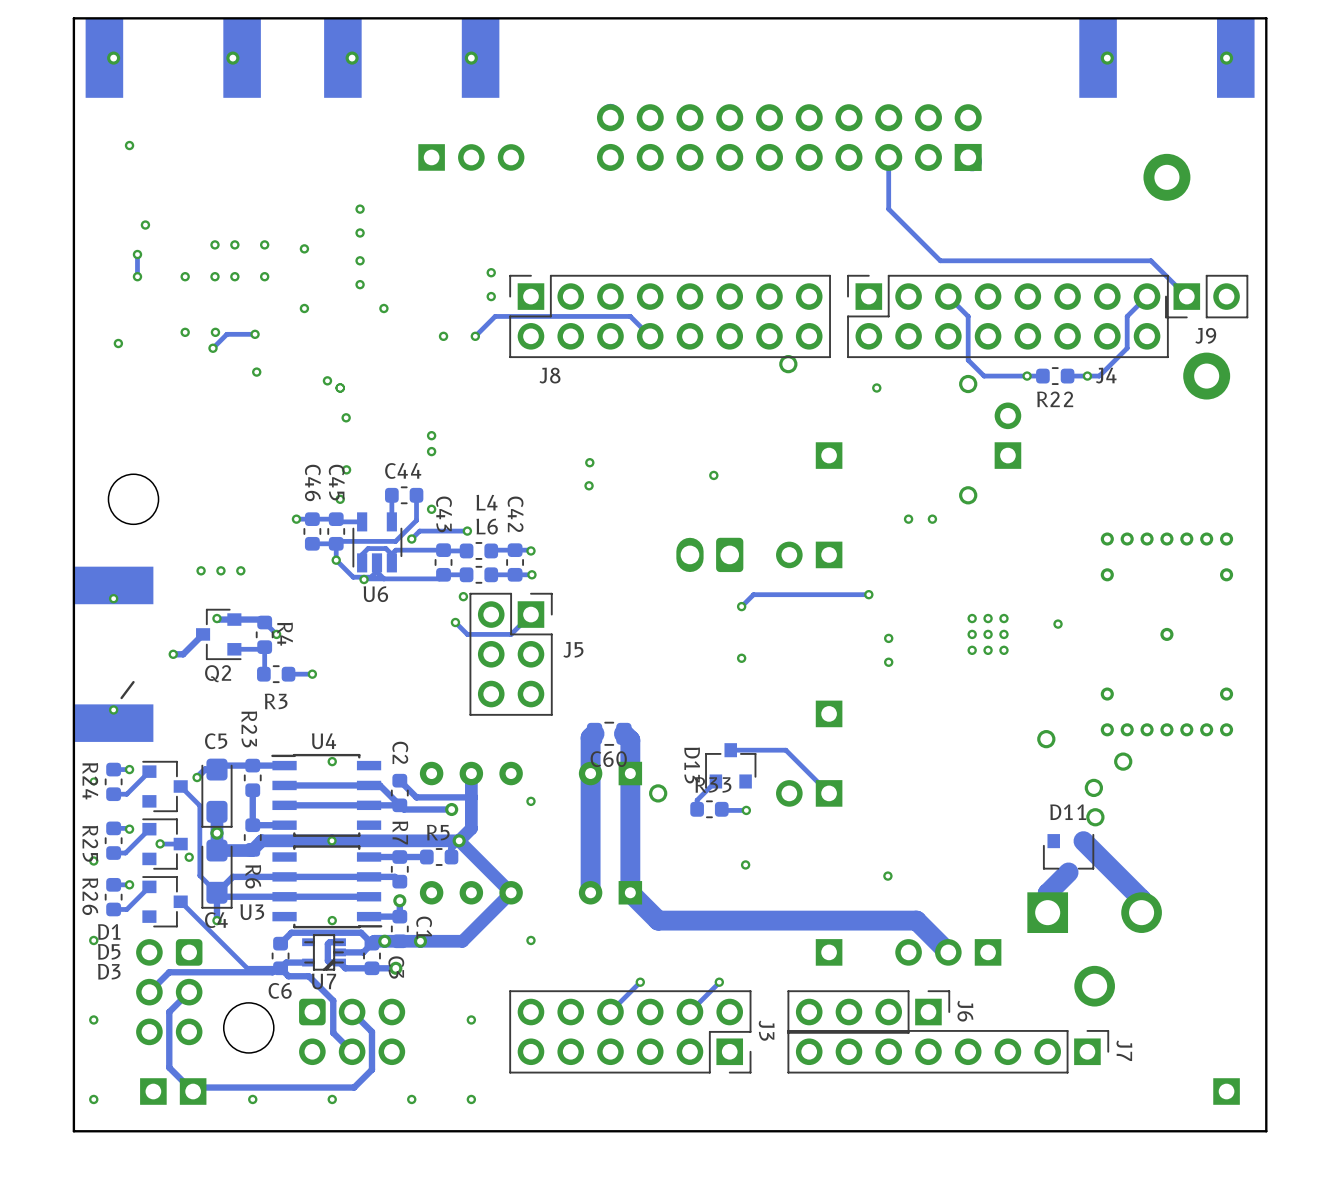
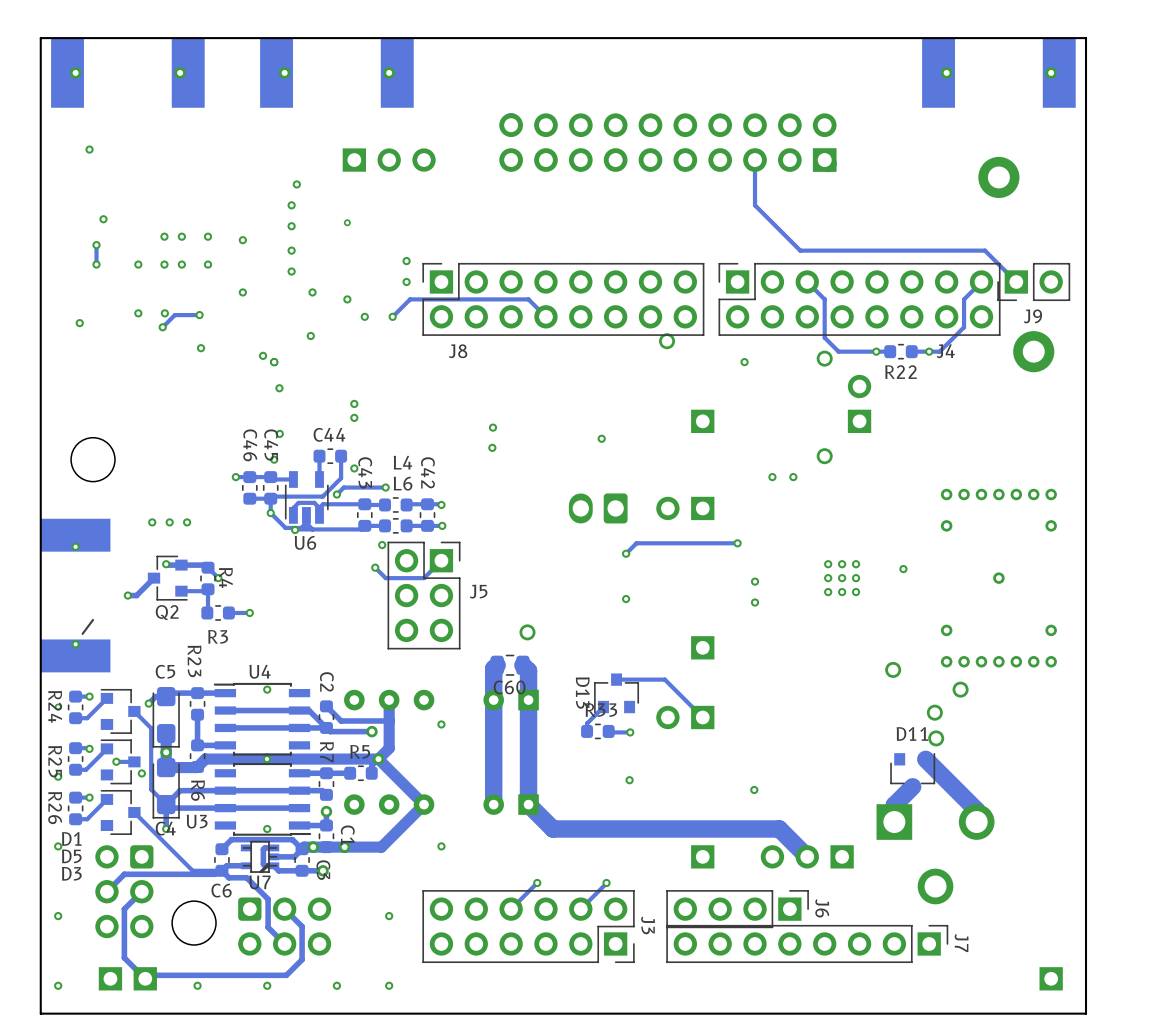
via: none -> (296, 184)
via: none -> (347, 222)
via: none -> (347, 299)
via: none -> (310, 335)
via: none -> (527, 632)
via: (658, 793) -> none

